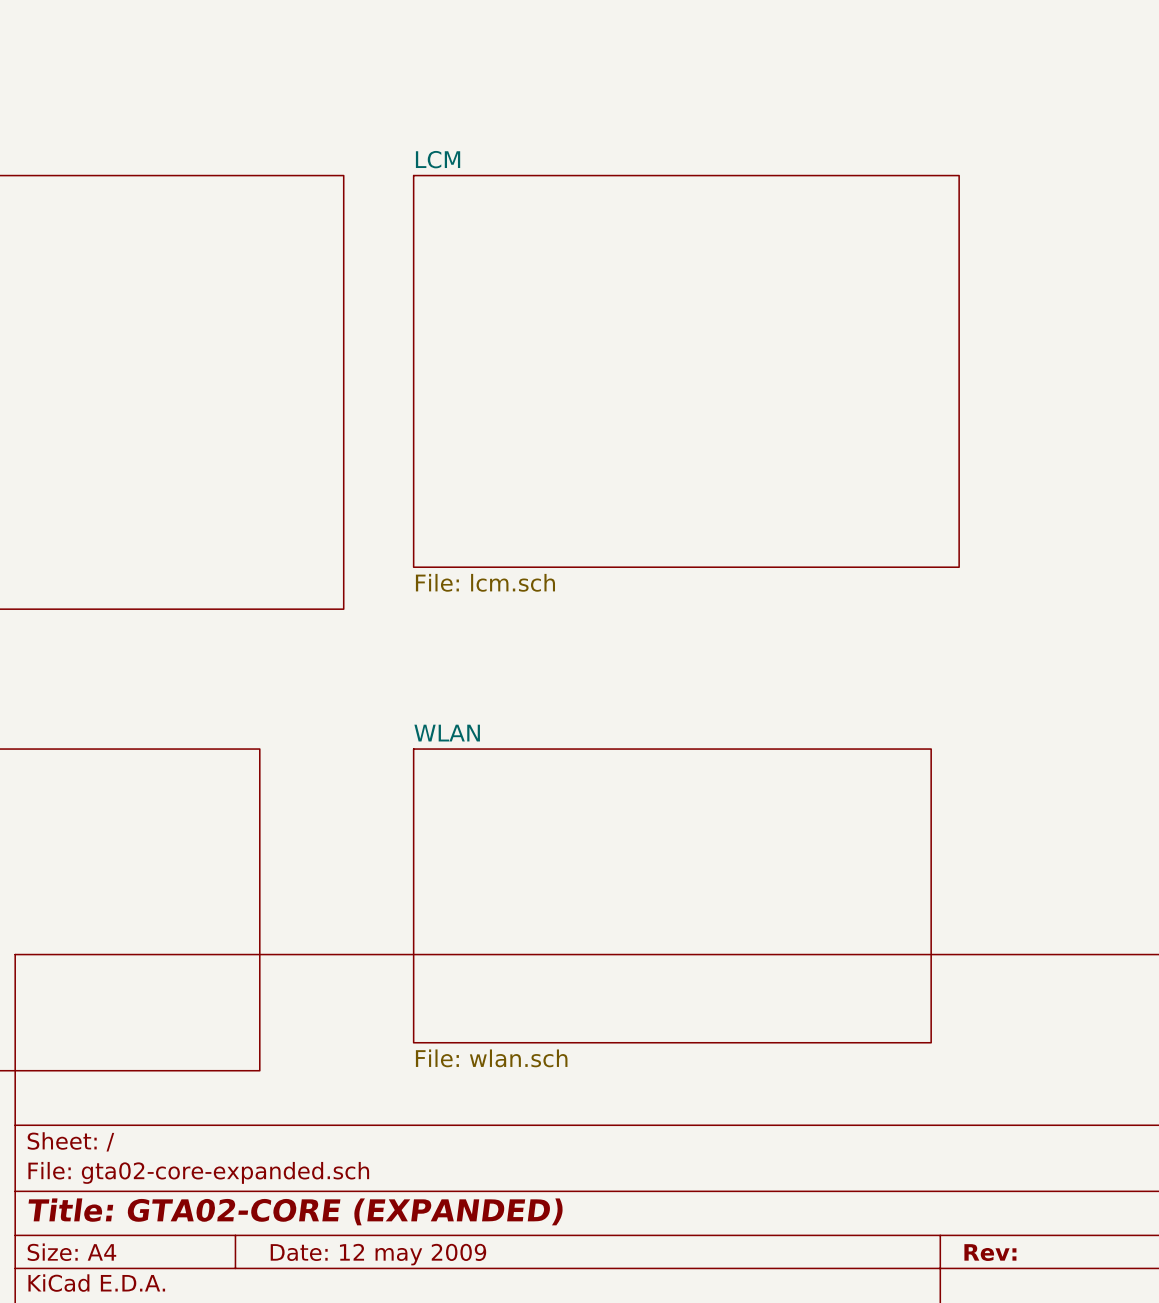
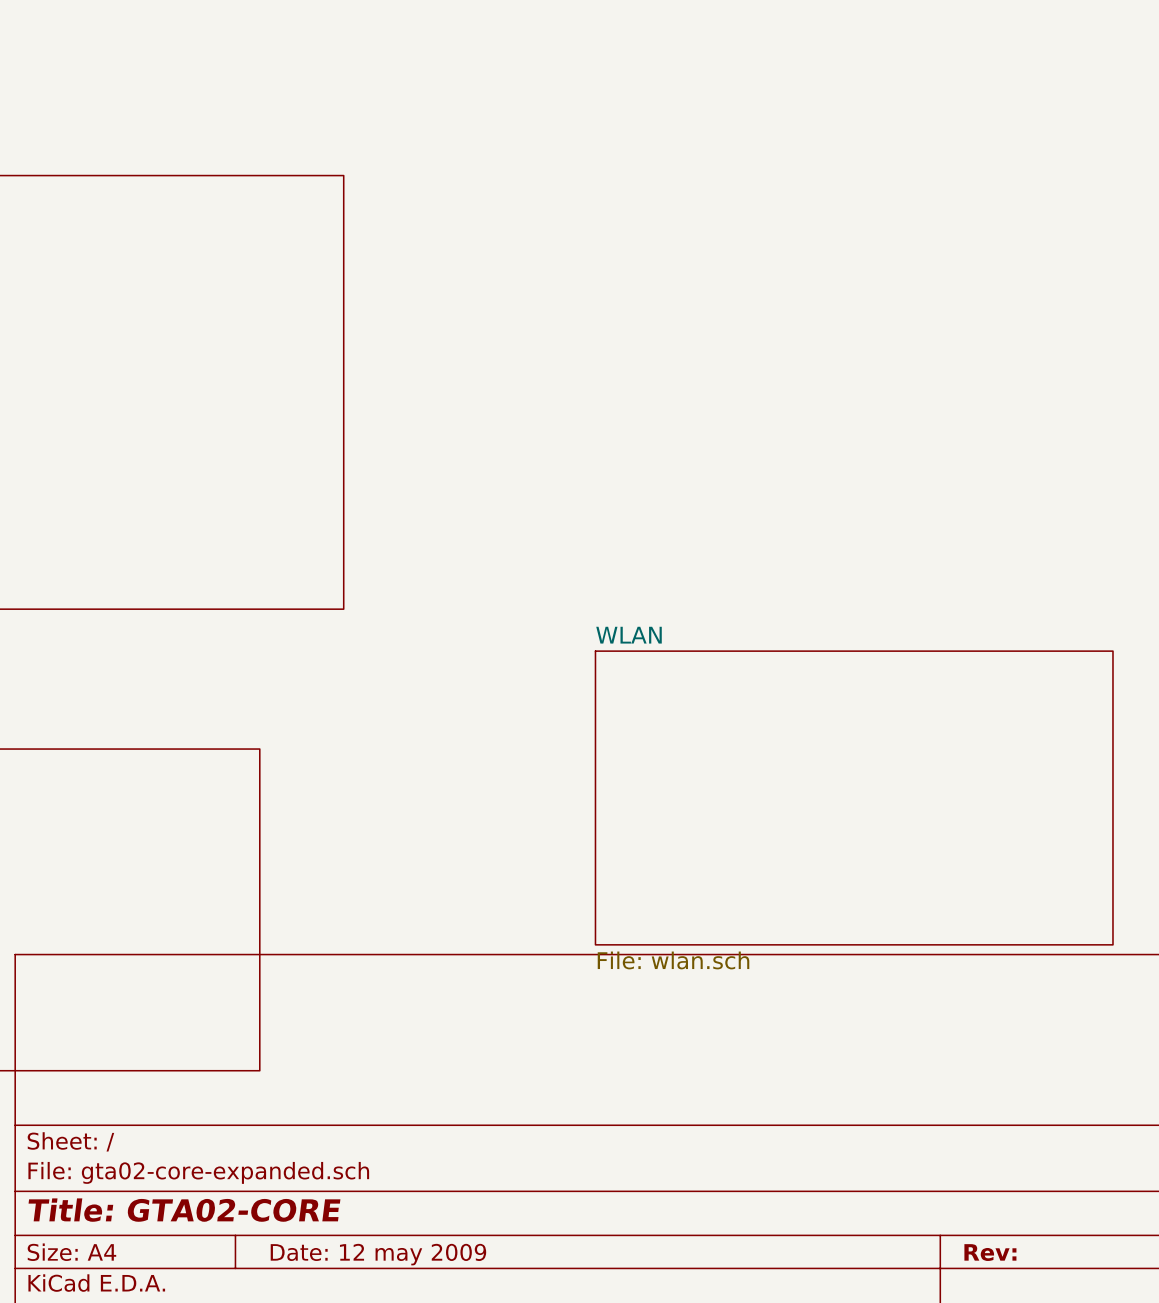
sheet LCM: File: lcm.sch (686, 371) -> none
sheet WLAN position: (672, 895) -> (854, 797)
title block: Title: GTA02-CORE (EXPANDED) (295, 1211) -> Title: GTA02-CORE (184, 1210)

